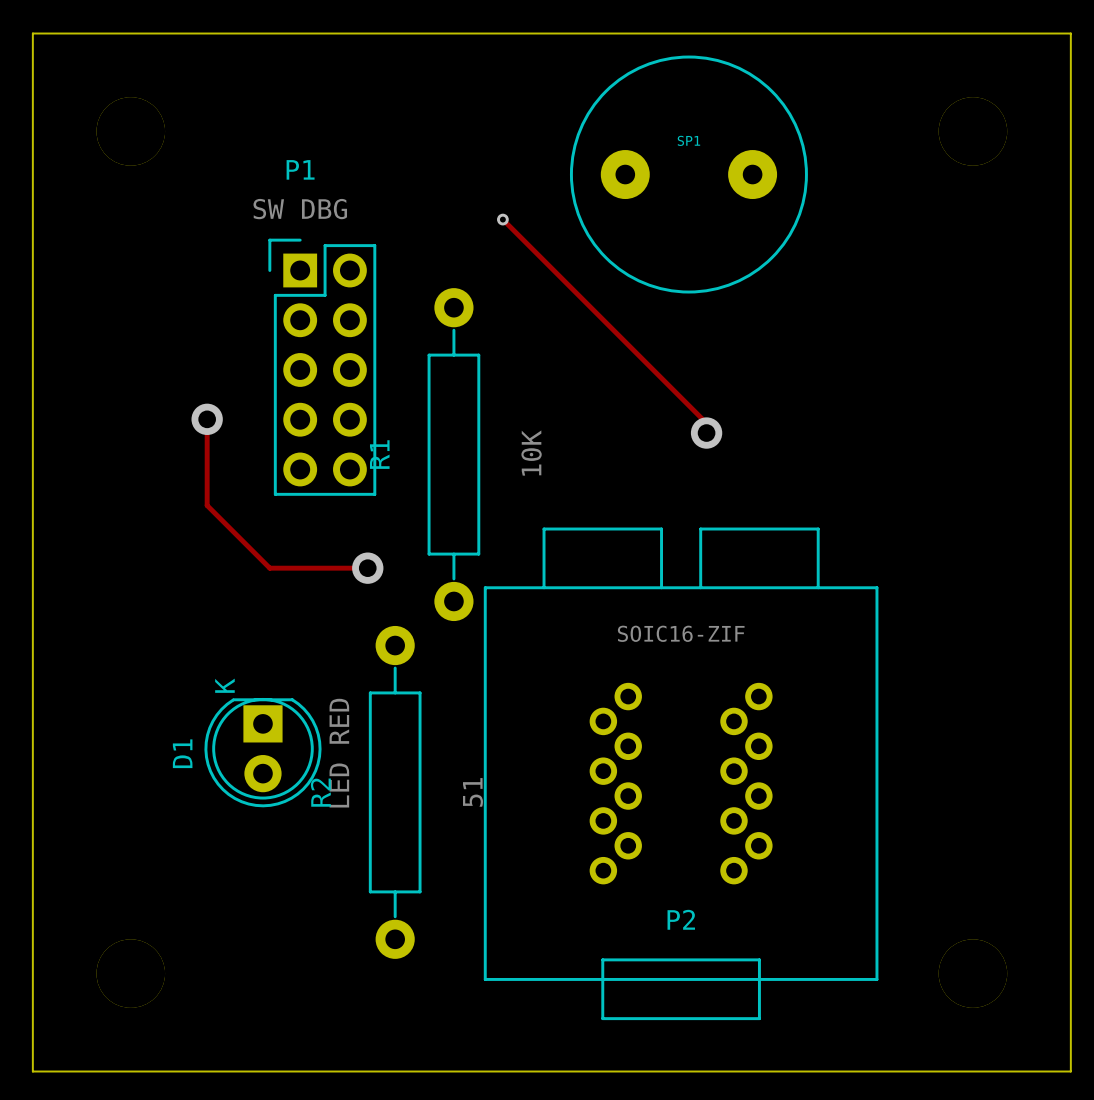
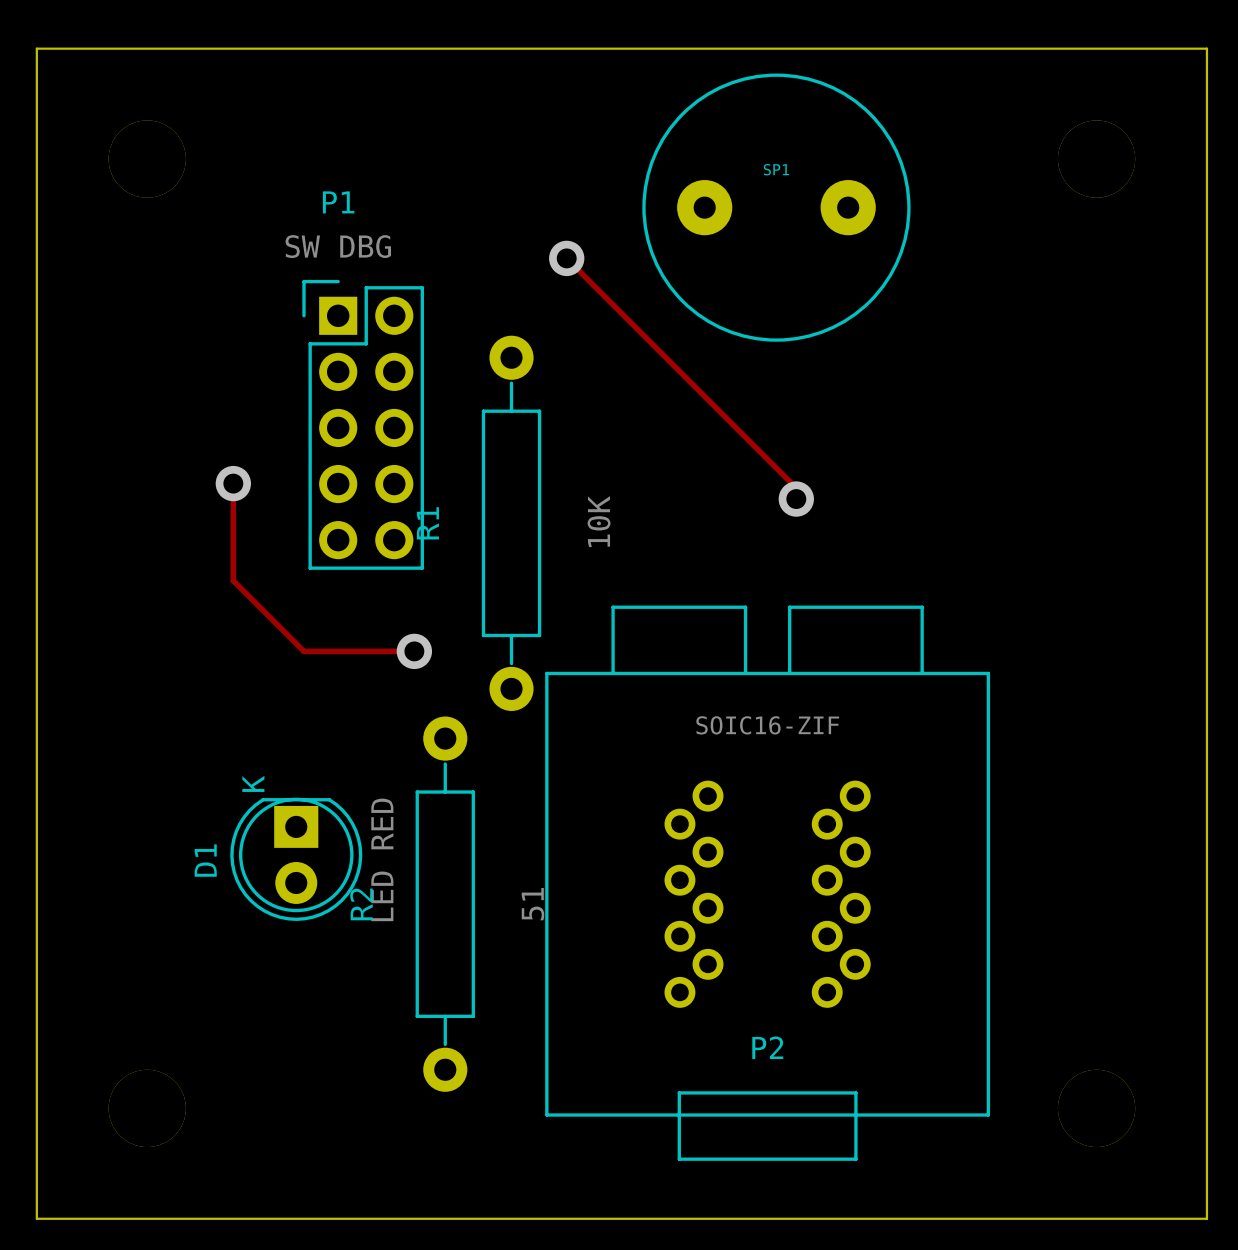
via size: [497, 213, 509, 226] -> [549, 240, 585, 277]

